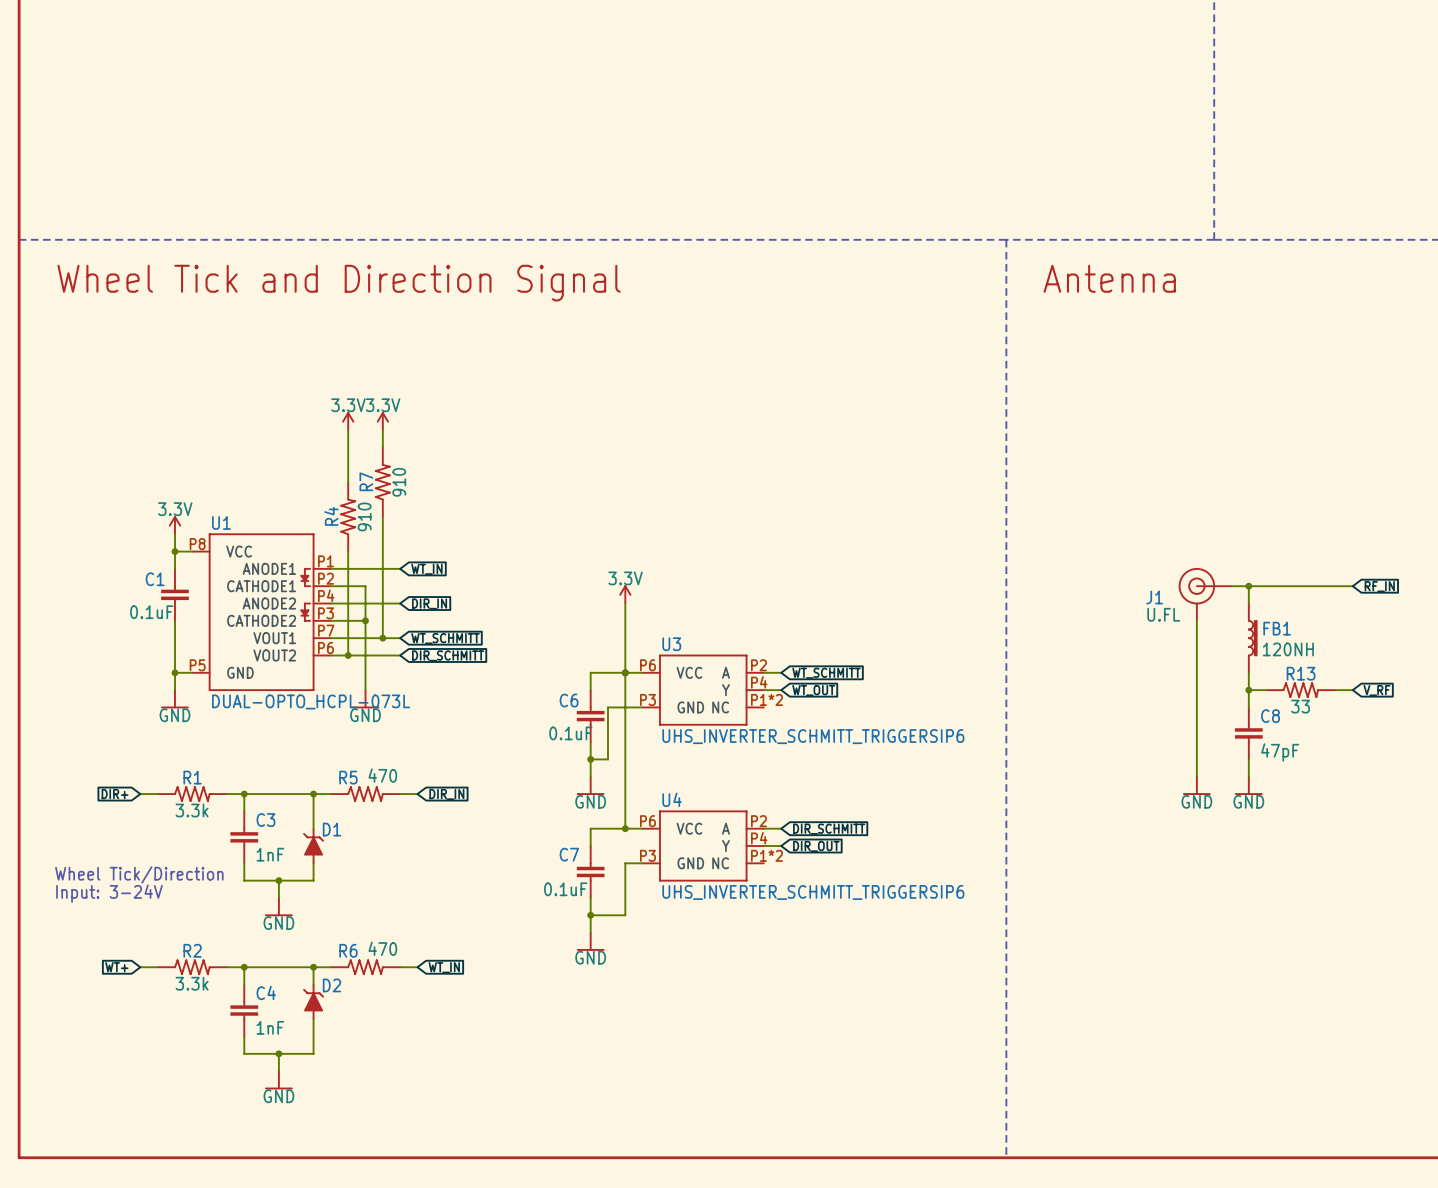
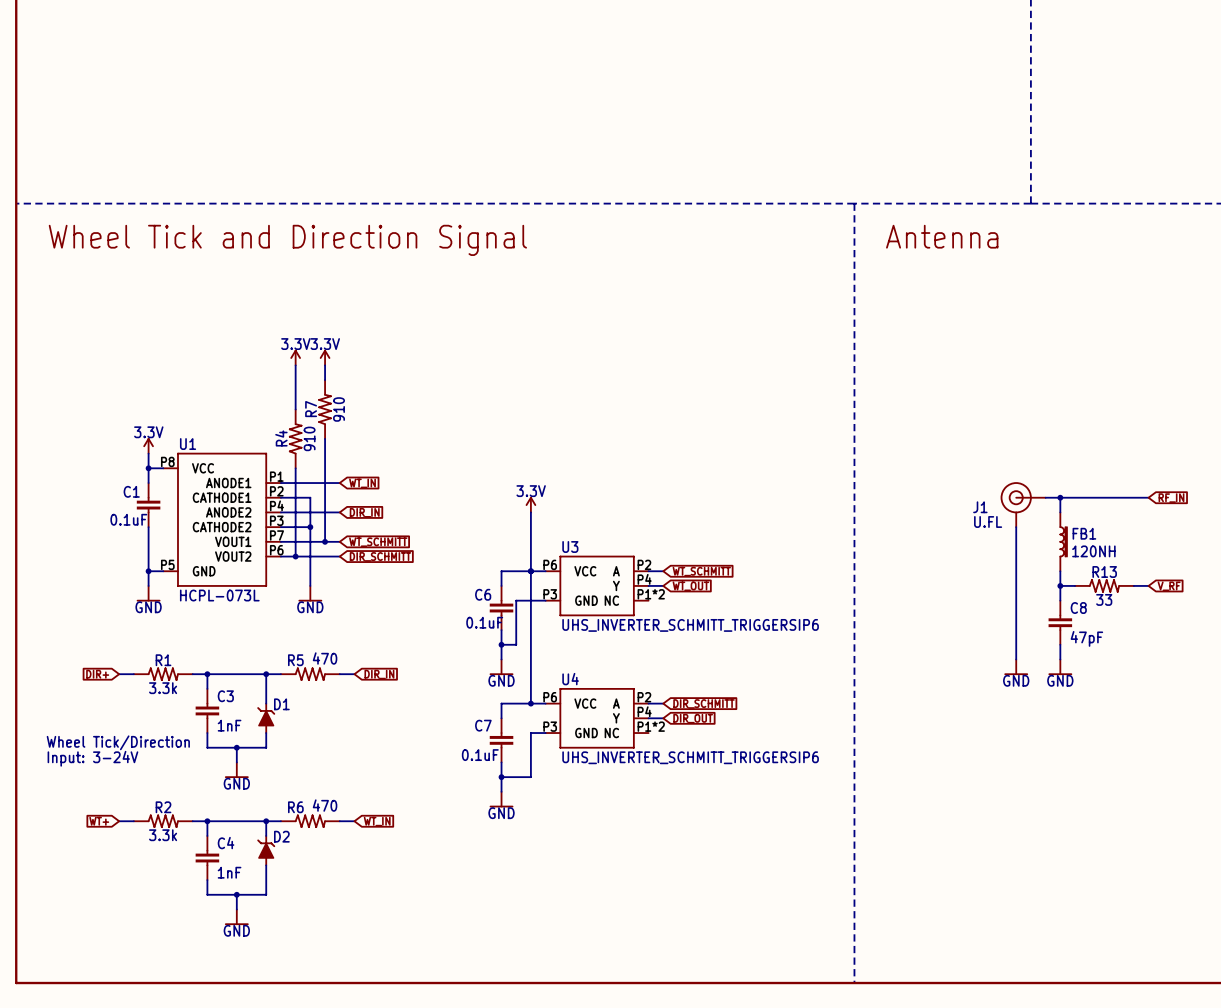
U1 symbol: [192, 533, 331, 691] -> [163, 452, 281, 587]
U1 value: DUAL-OPTO_HCPL-073L (311, 701) -> HCPL-073L (219, 595)

